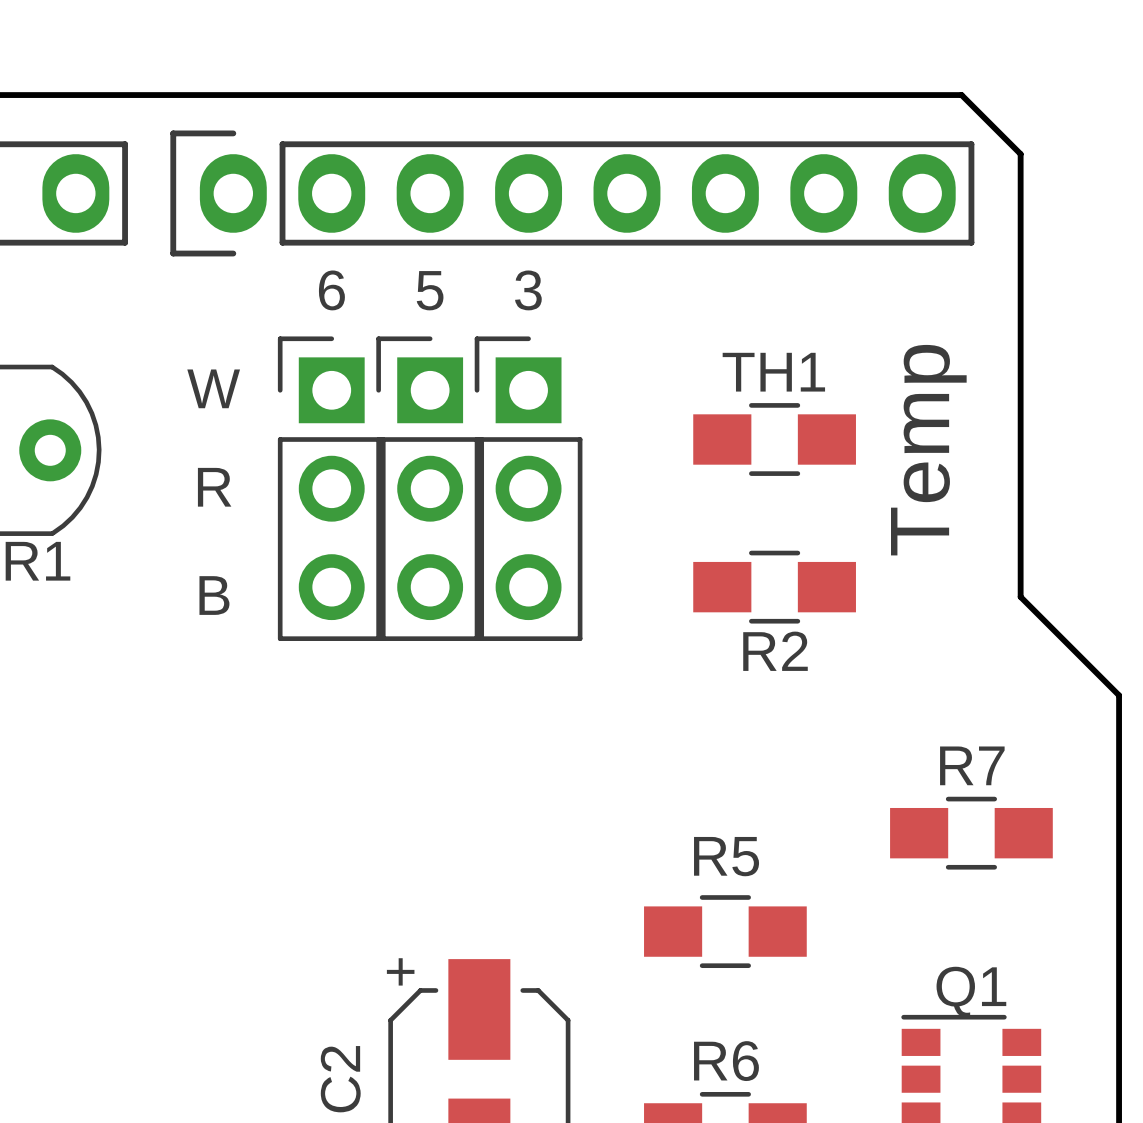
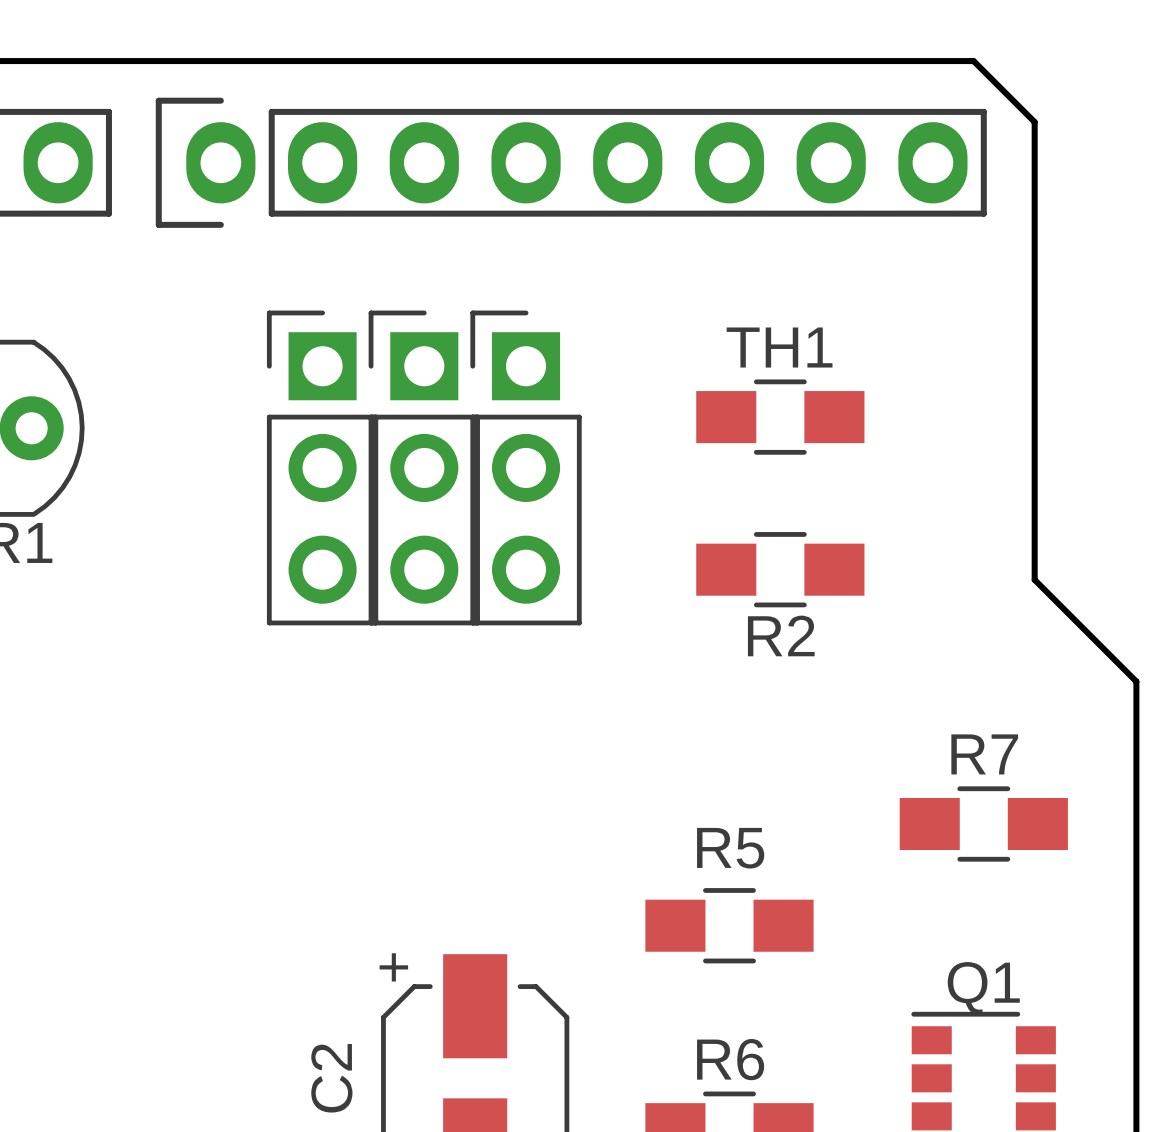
text: 6 (331, 290) -> none
text: 5 (430, 290) -> none
text: 3 (528, 290) -> none
text: W (213, 388) -> none
text: Temp (928, 450) -> none
text: R (214, 487) -> none
text: B (214, 595) -> none

